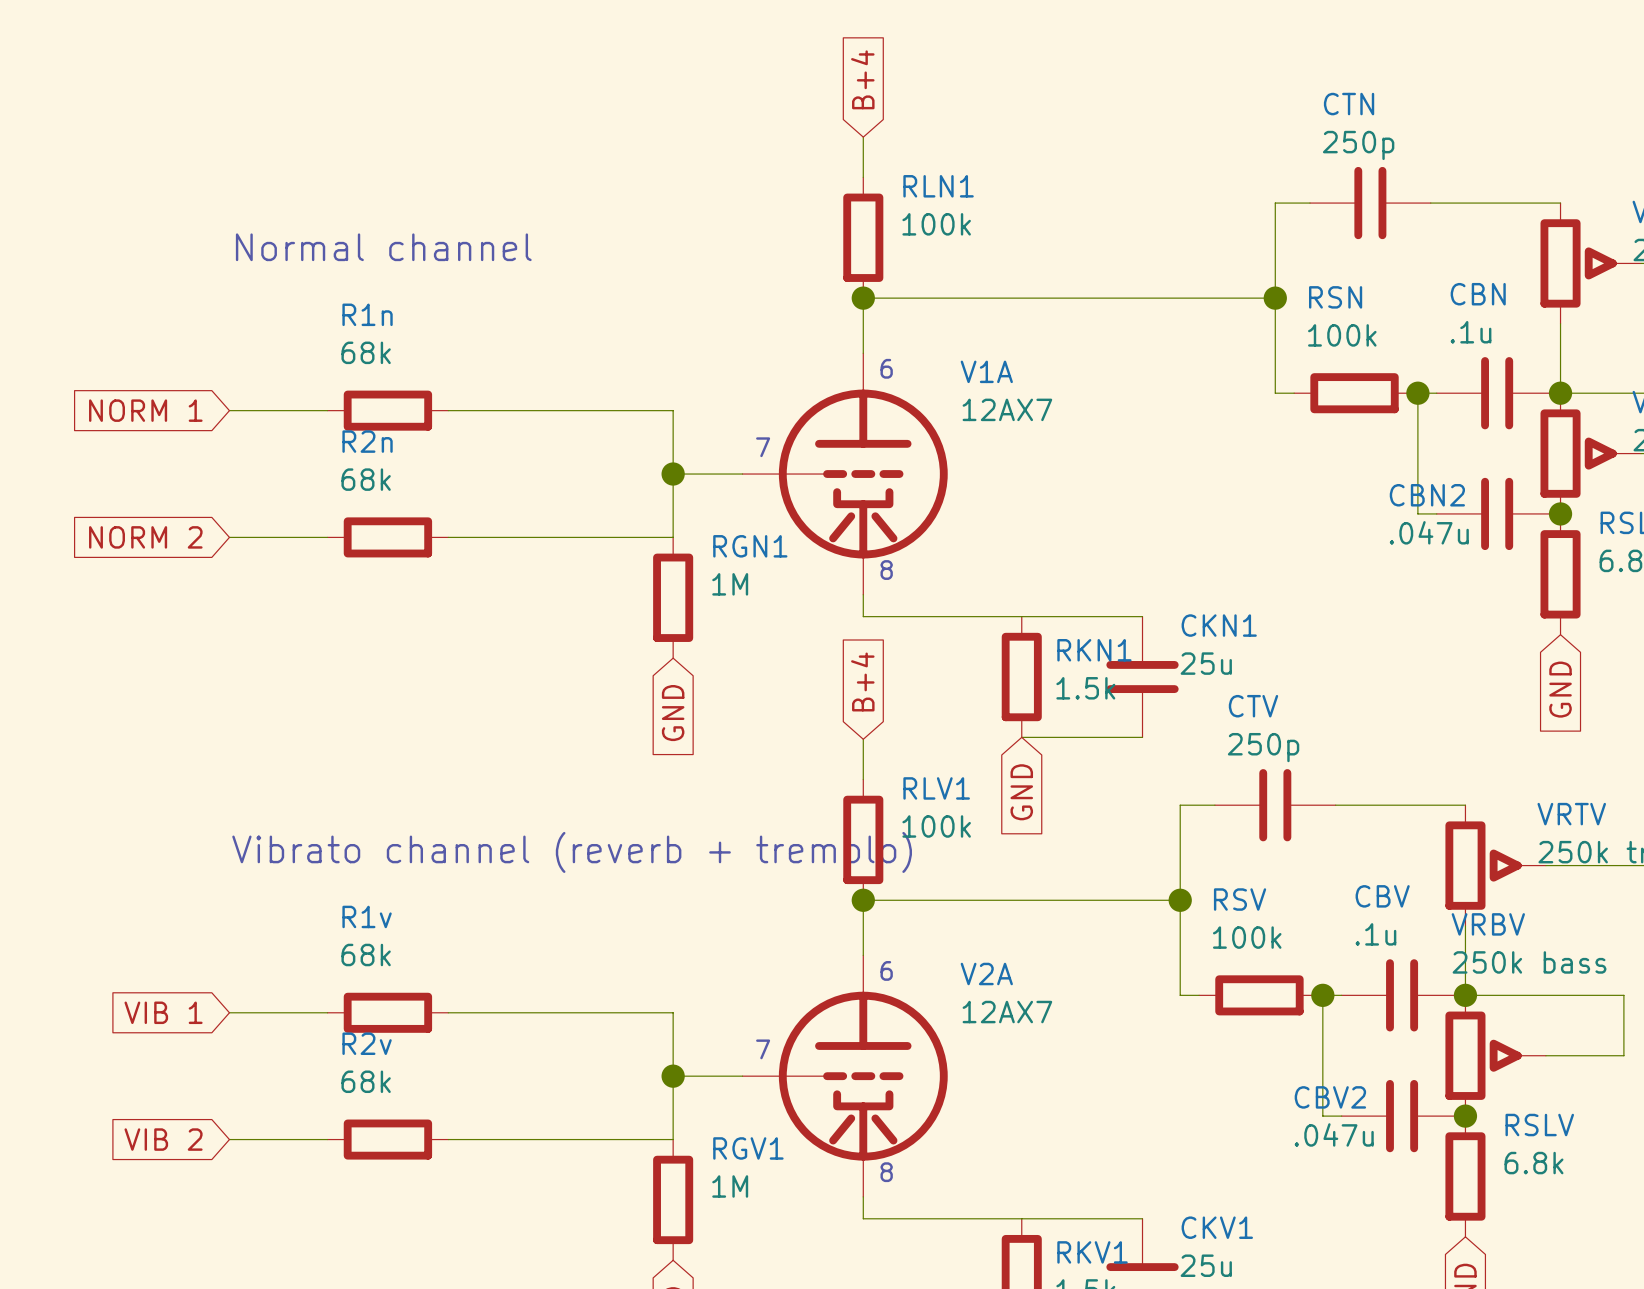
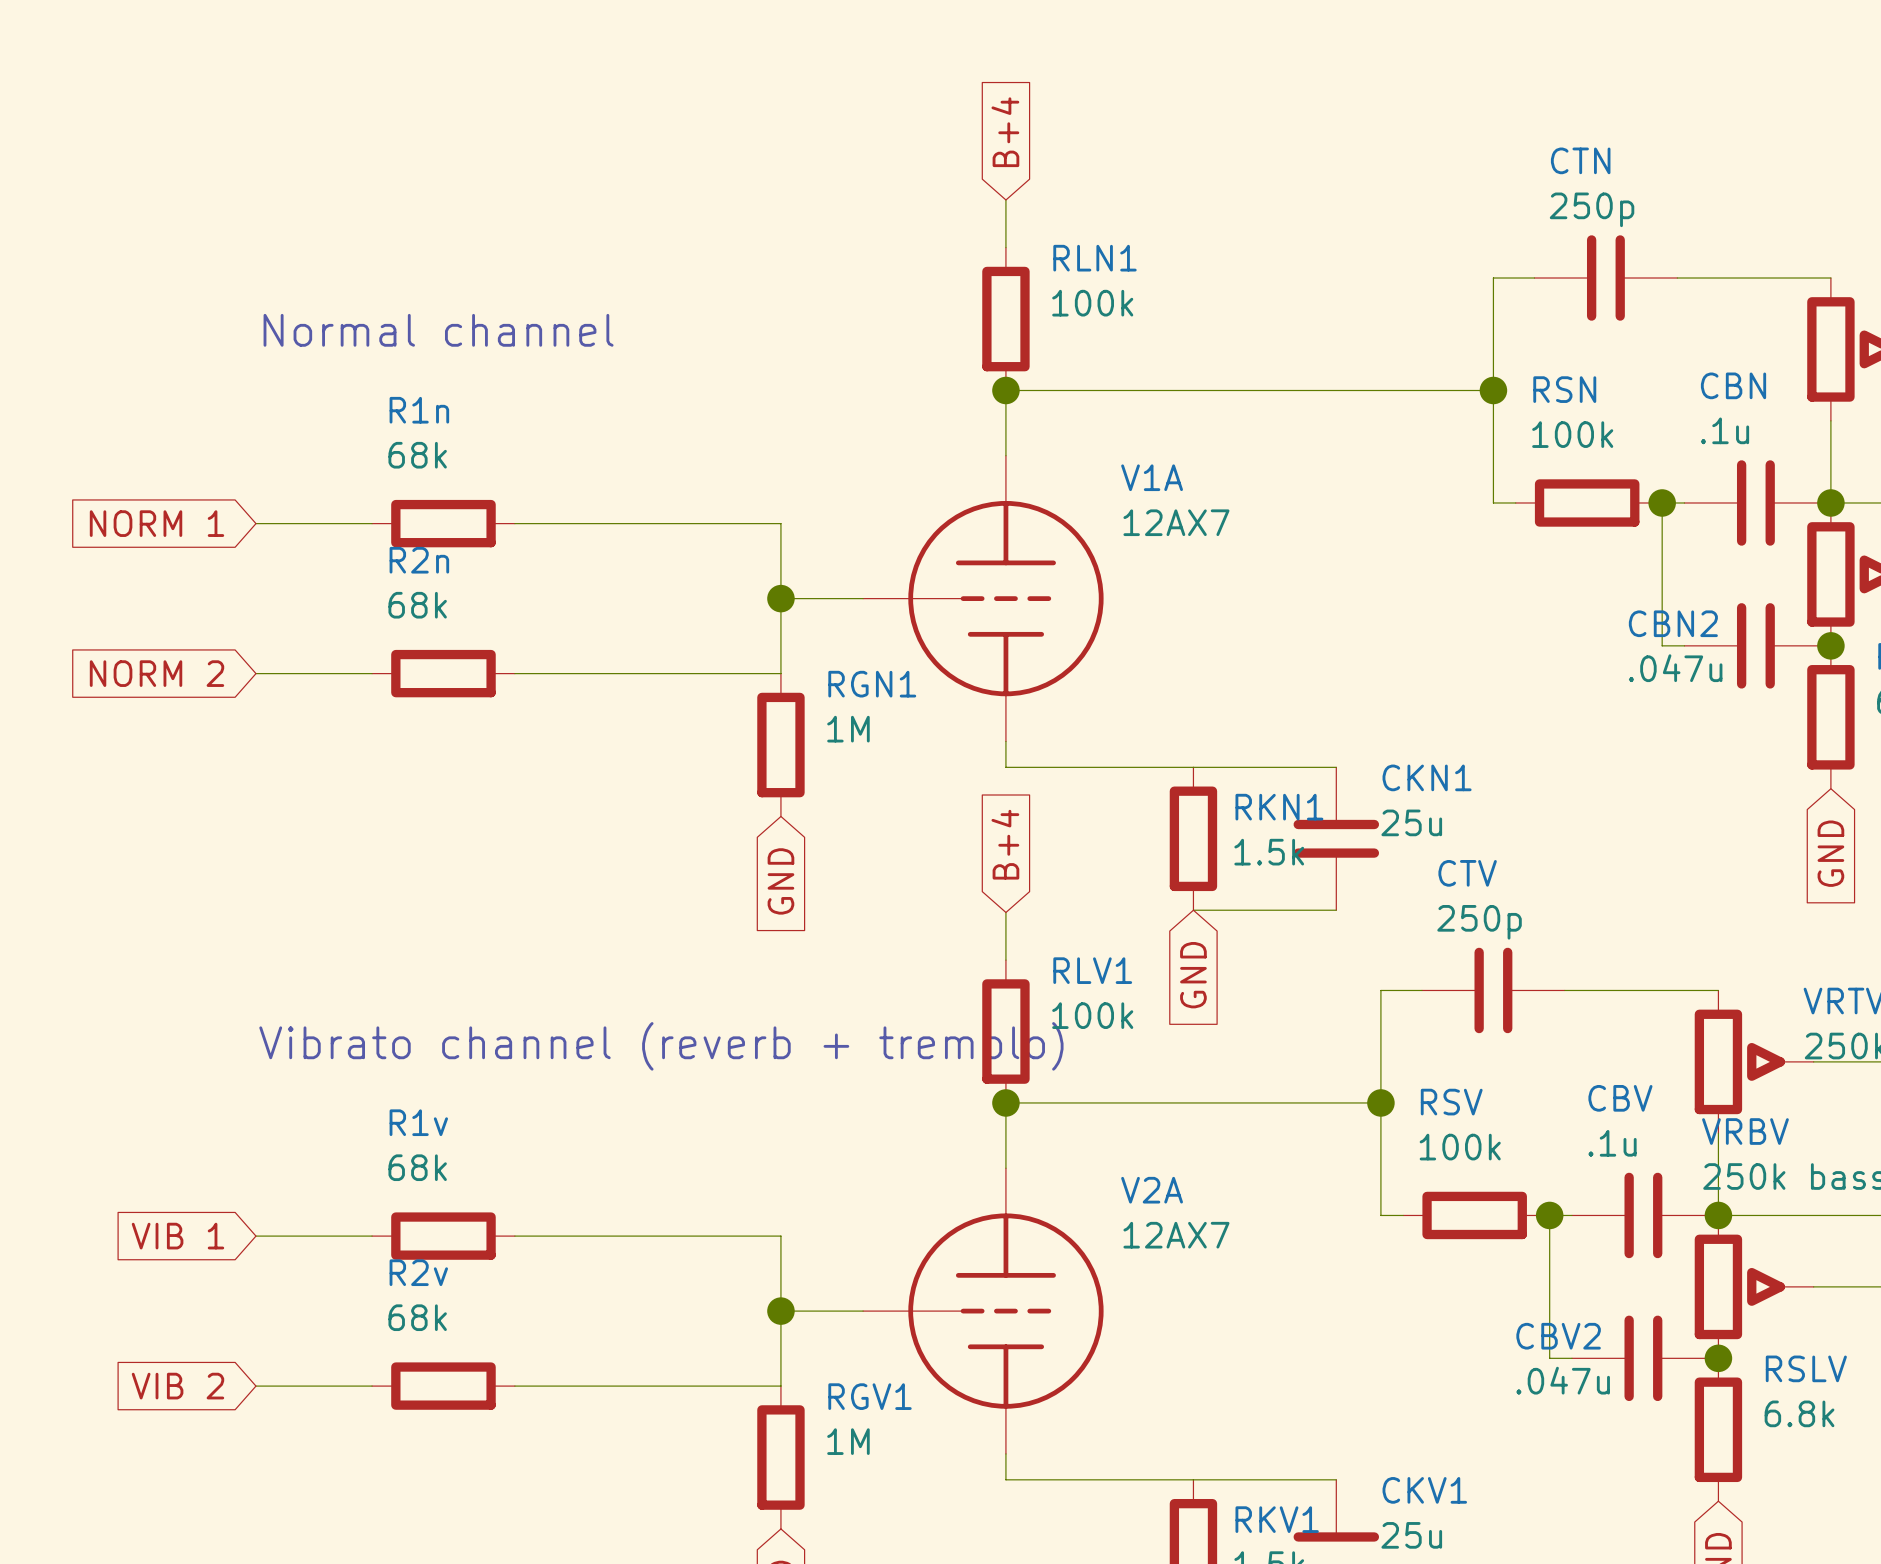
V1A symbol: [742, 353, 948, 595] -> [863, 455, 1104, 742]
text: 6 (886, 368) -> none
text: 7 (763, 447) -> none
text: 8 (886, 570) -> none
V2A symbol: [742, 955, 948, 1197] -> [863, 1168, 1104, 1454]
text: 6 (886, 970) -> none
text: 7 (763, 1049) -> none
text: 8 (886, 1172) -> none

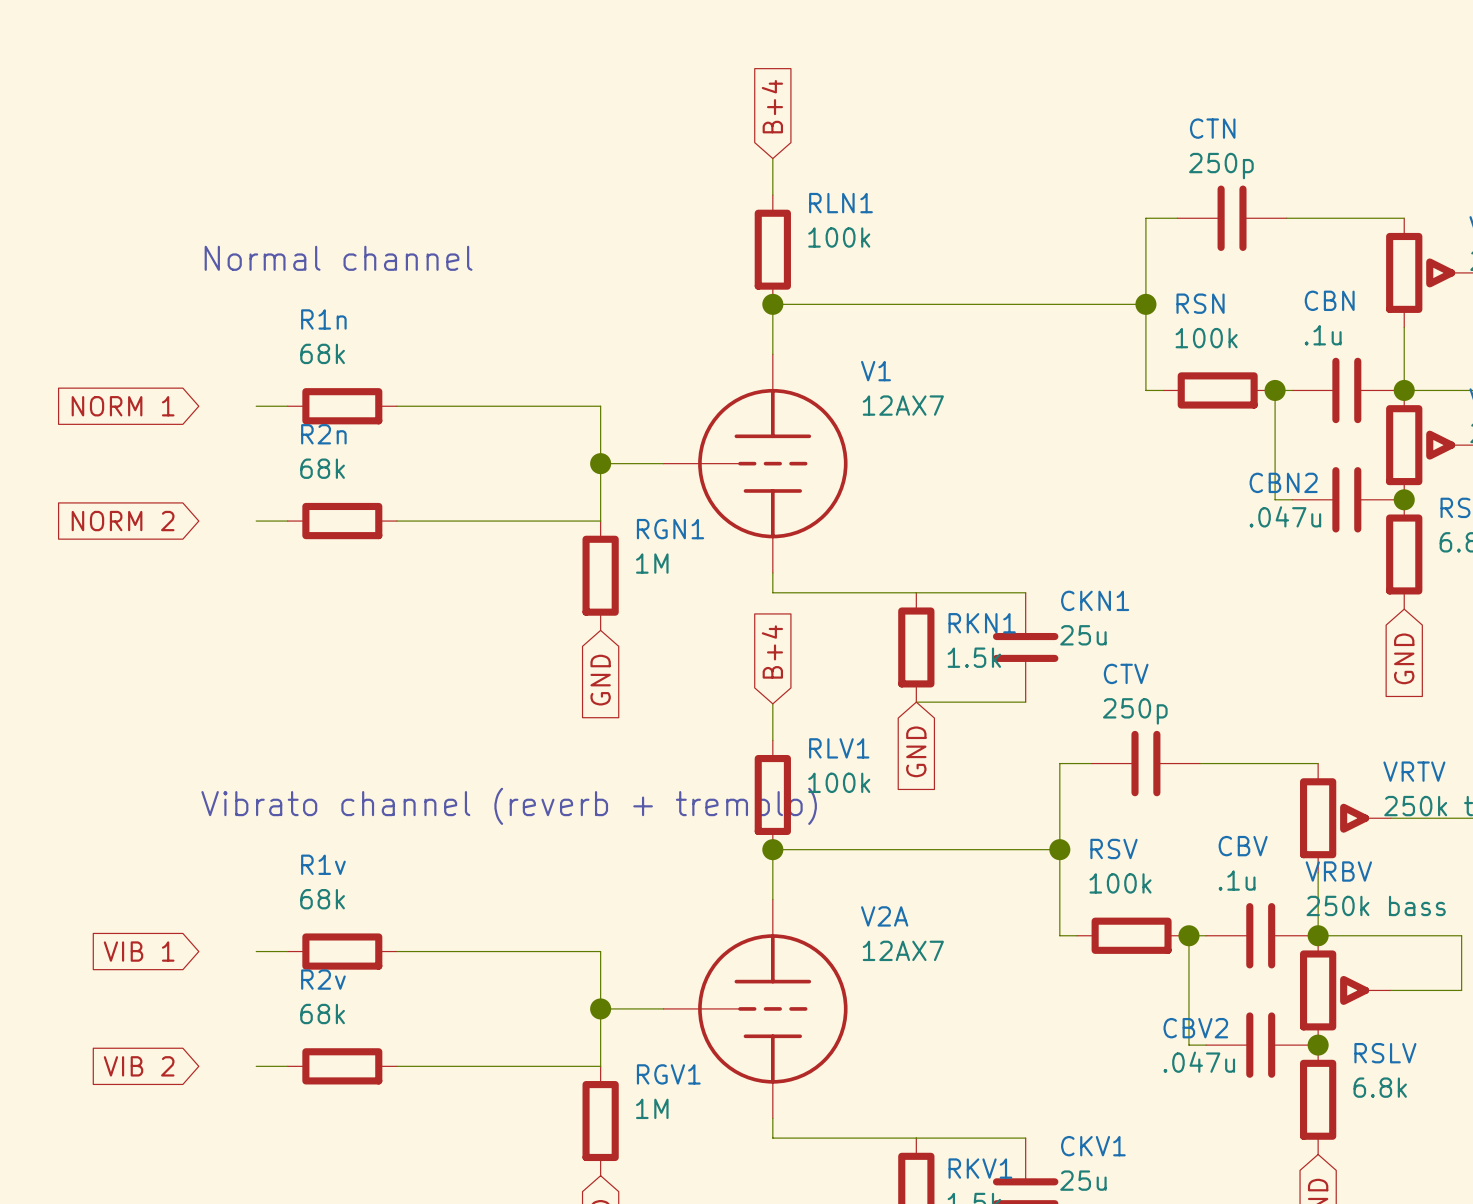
V1A name: V1A (1152, 477) -> V1 (875, 371)
wire: (255, 523) (330, 523) -> none
wire: (255, 673) (330, 673) -> none
wire: (255, 1236) (330, 1236) -> none
wire: (255, 1386) (330, 1386) -> none

